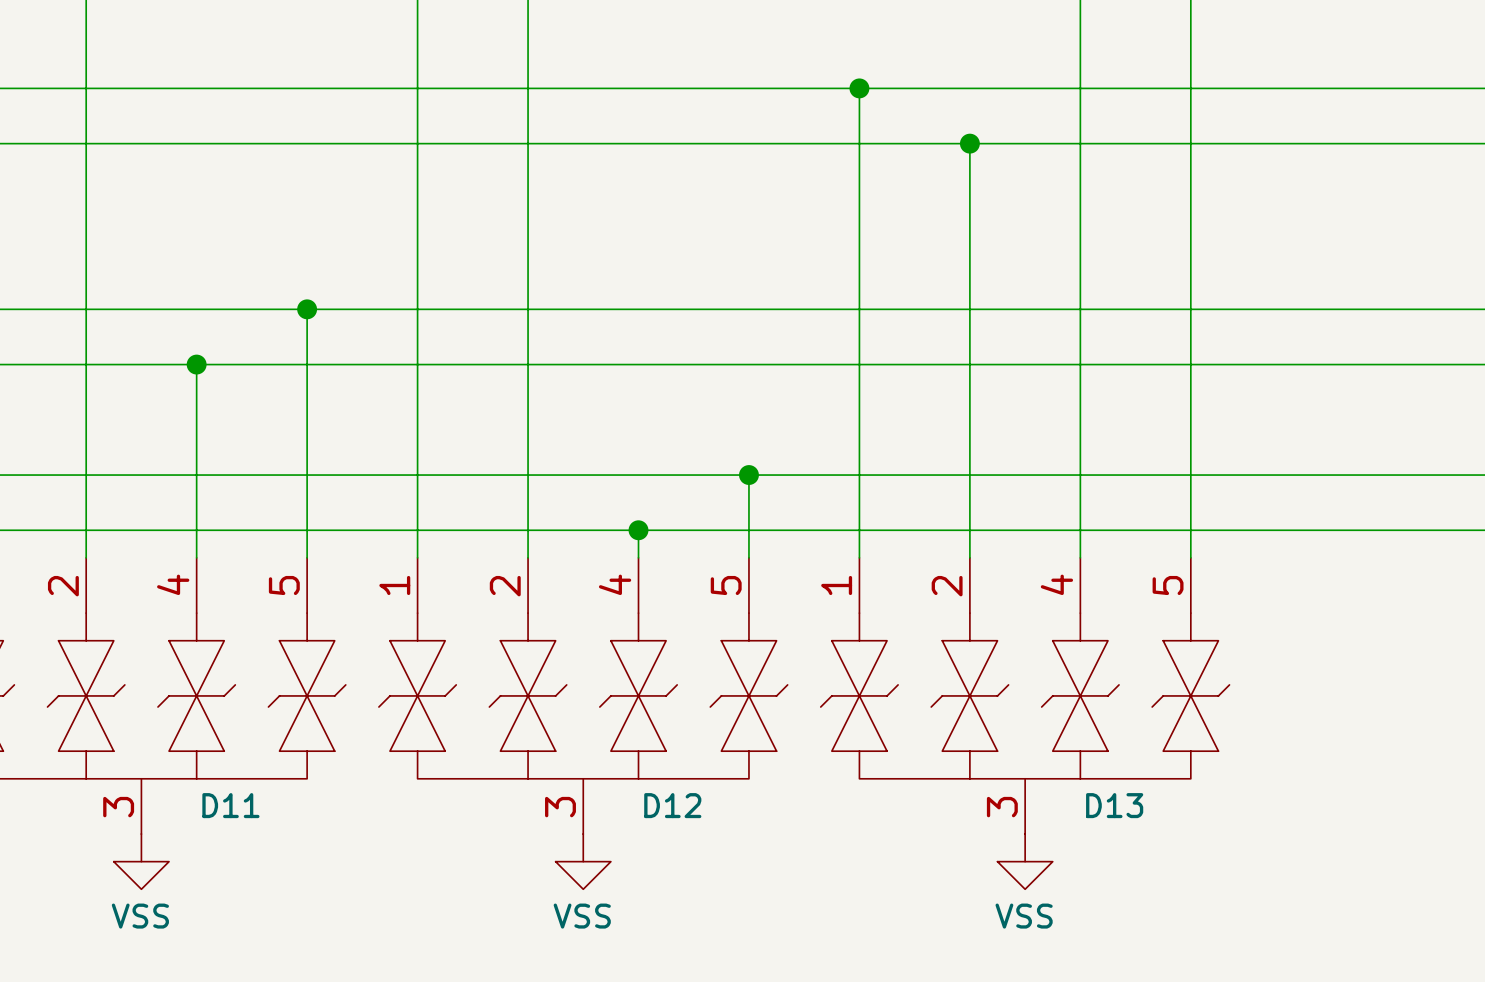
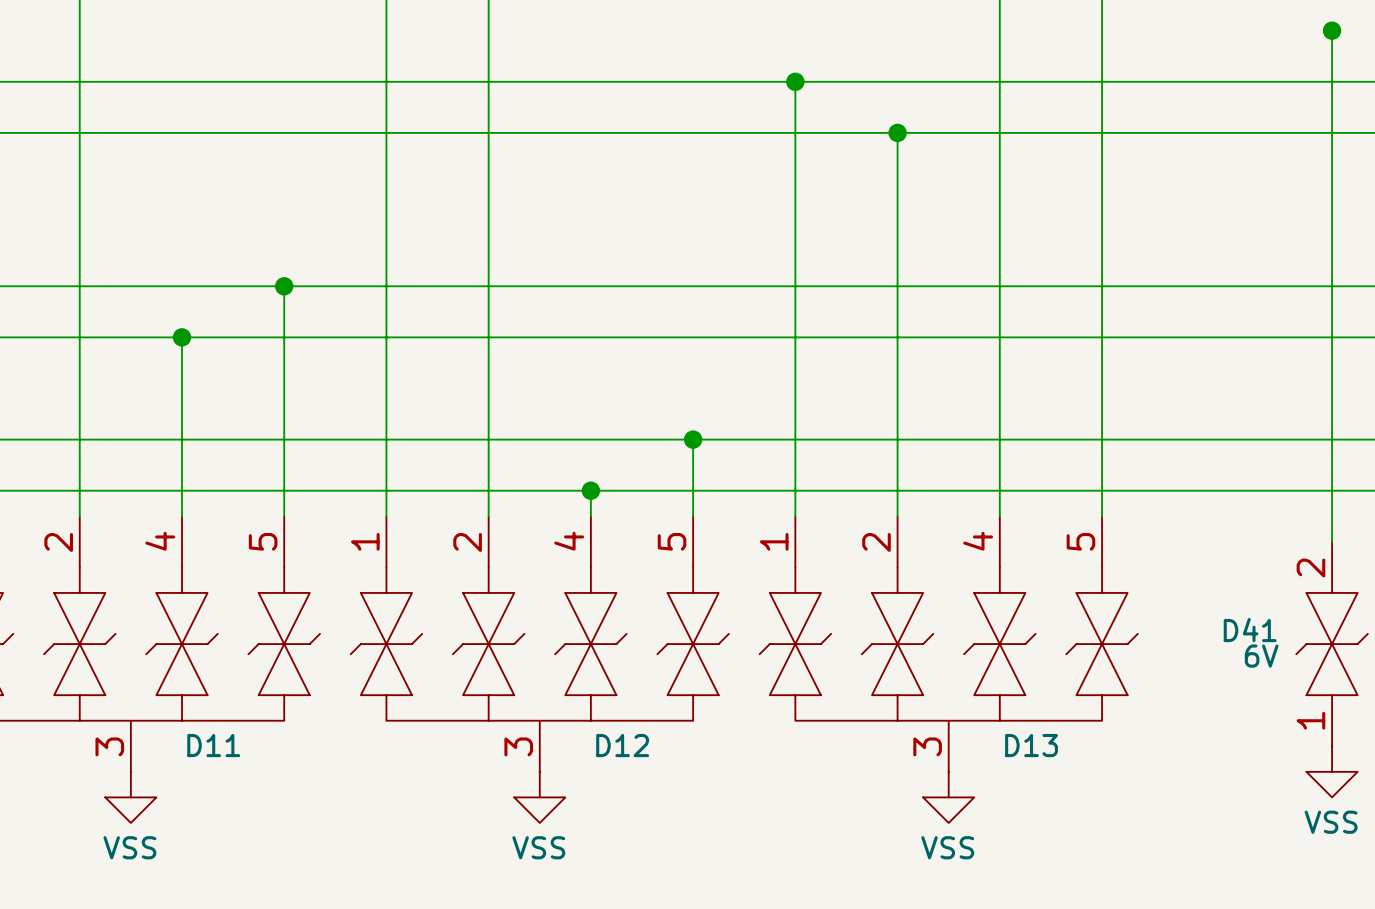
wire: none -> (1332, 30) (1332, 541)
junction: none -> (1332, 30)
D41: none -> 6V (1332, 644)
power symbol: none -> VSS (1332, 771)

